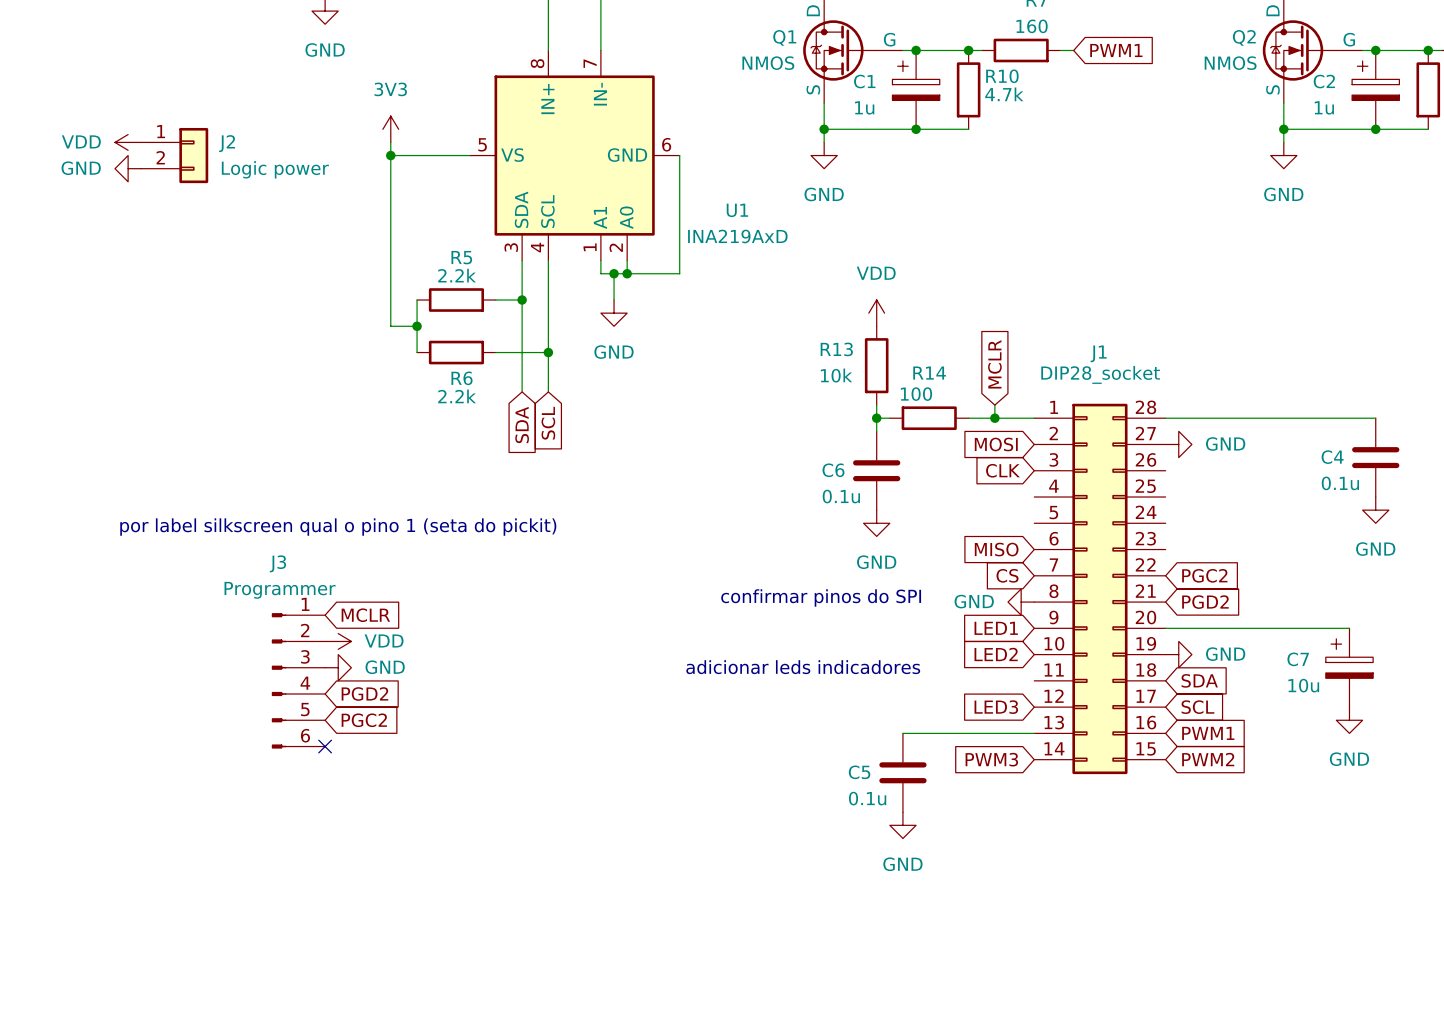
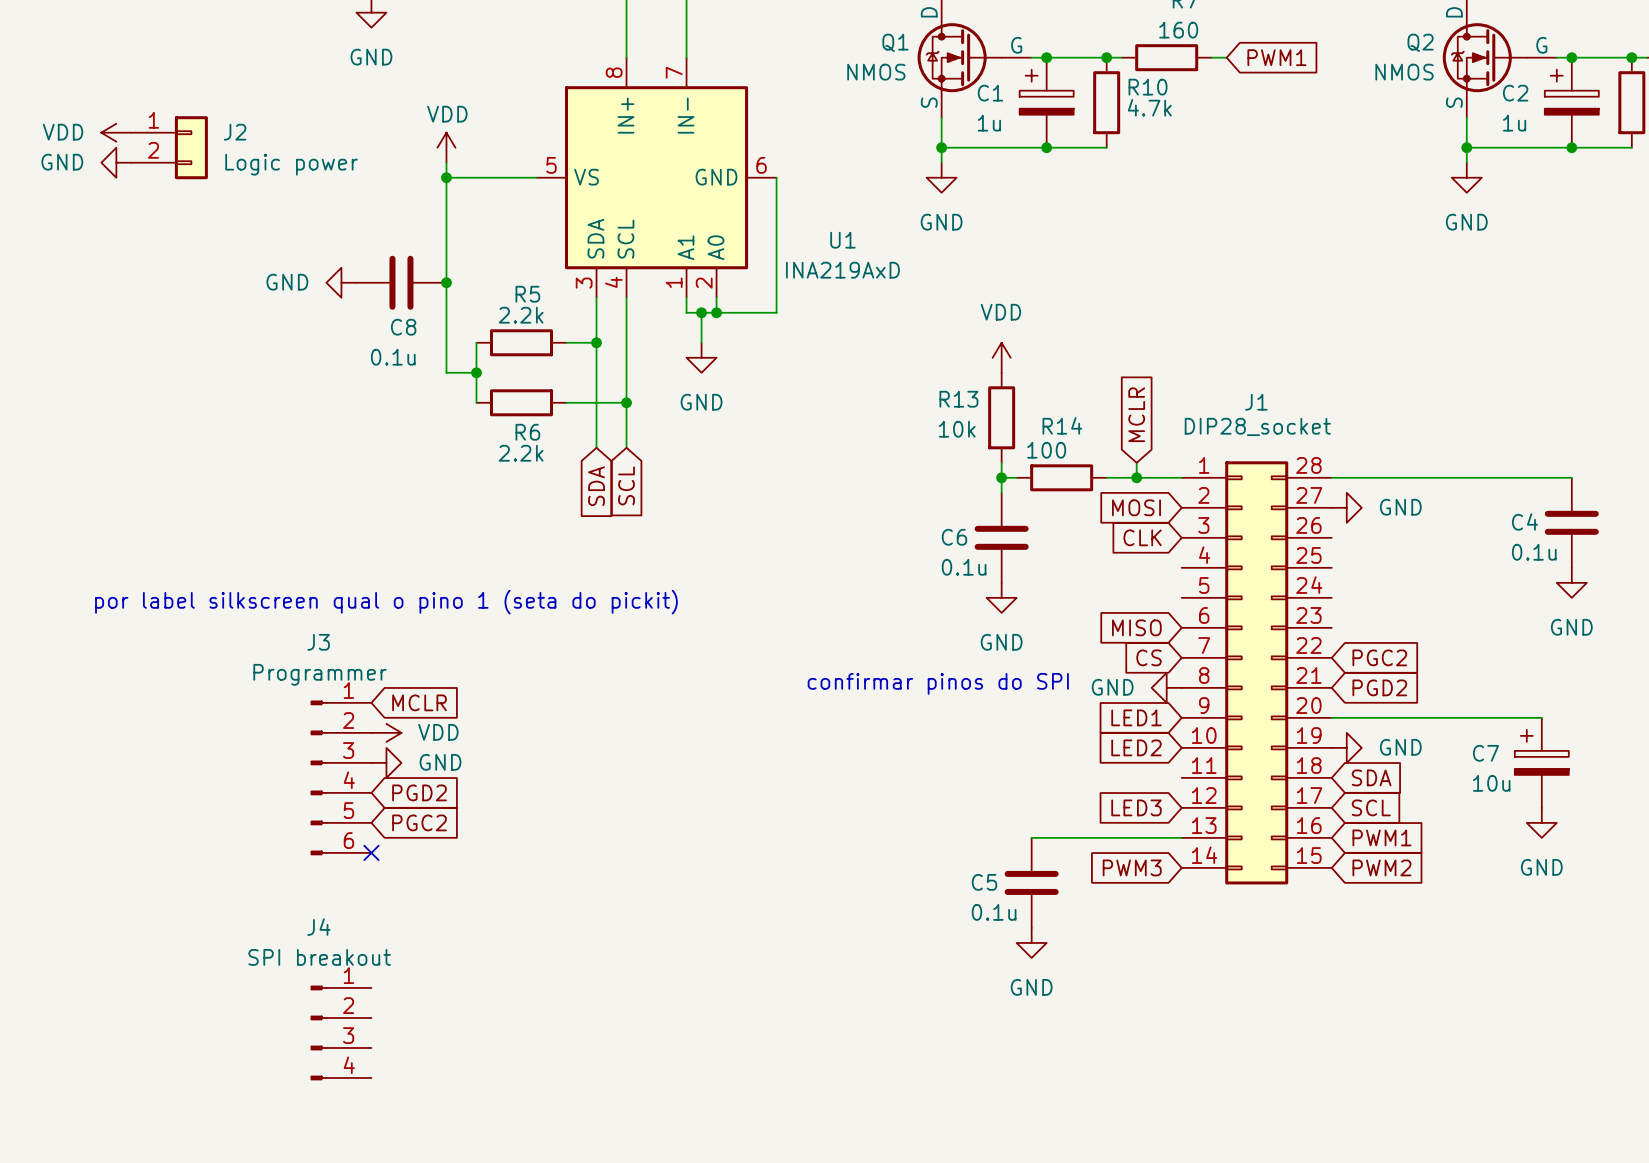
power symbol: 3V3 (390, 129) -> VDD (446, 147)
power symbol position: VDD (128, 142) -> VDD (116, 132)
J2 position: (174, 155) -> (169, 147)
power symbol position: GND (128, 168) -> GND (116, 162)
power symbol: none -> GND (341, 282)
C8: none -> 0.1u (401, 282)
junction: none -> (446, 282)
text: adicionar leds indicadores (803, 667) -> none
J4: none -> SPI breakout (340, 1032)

